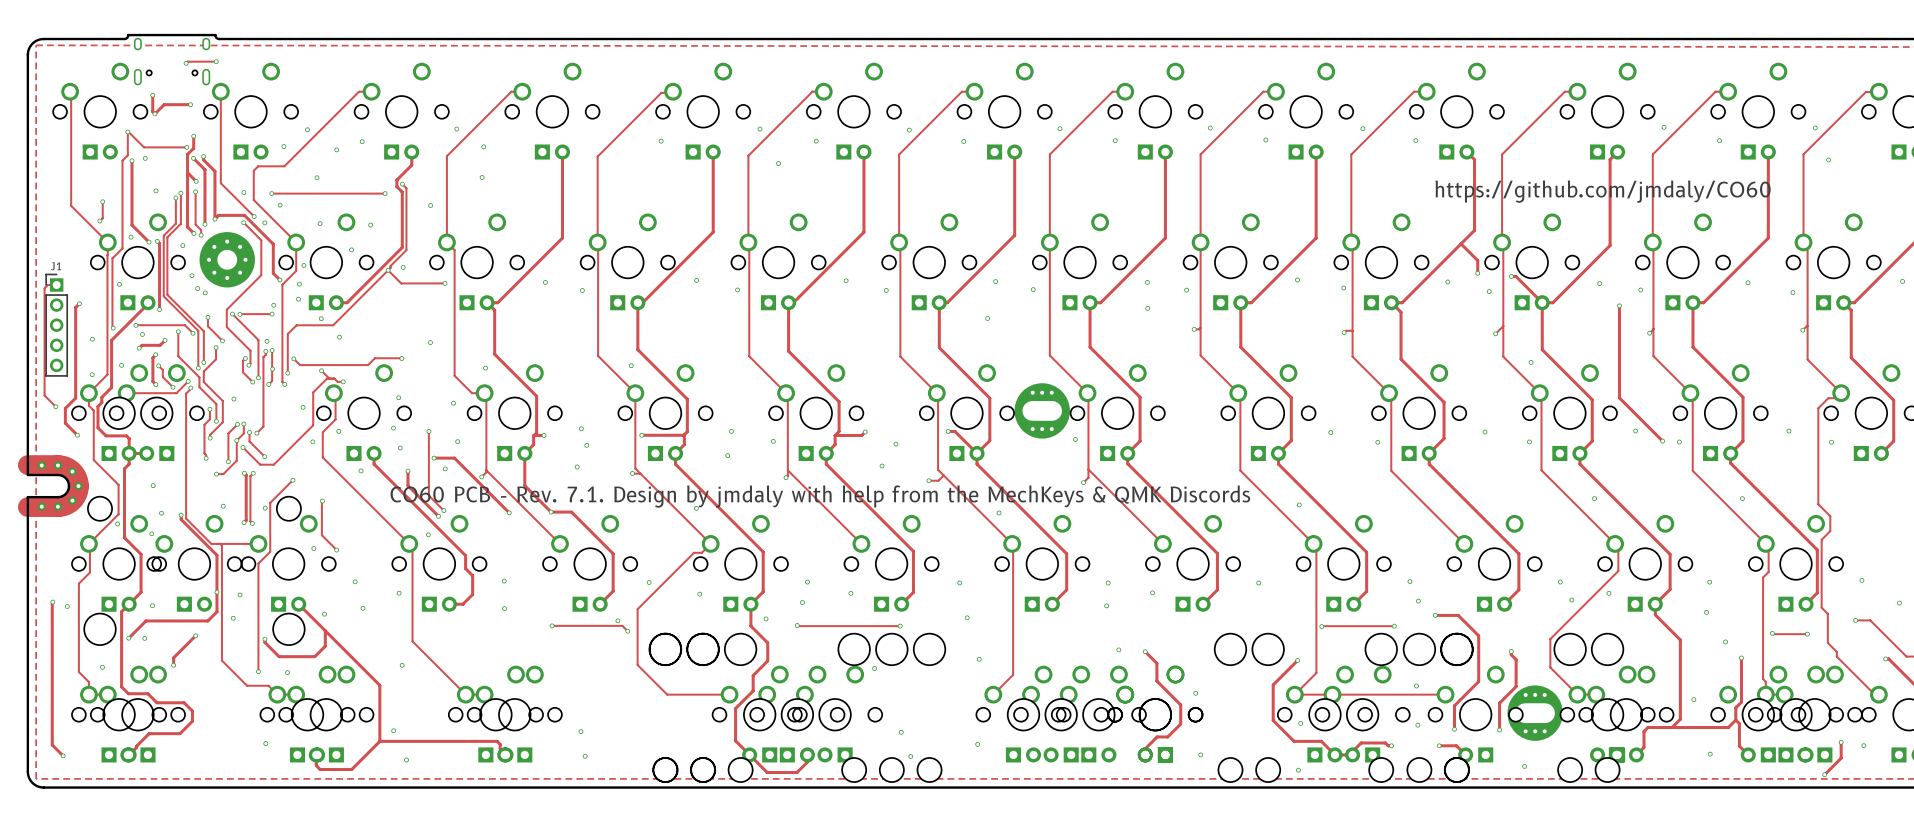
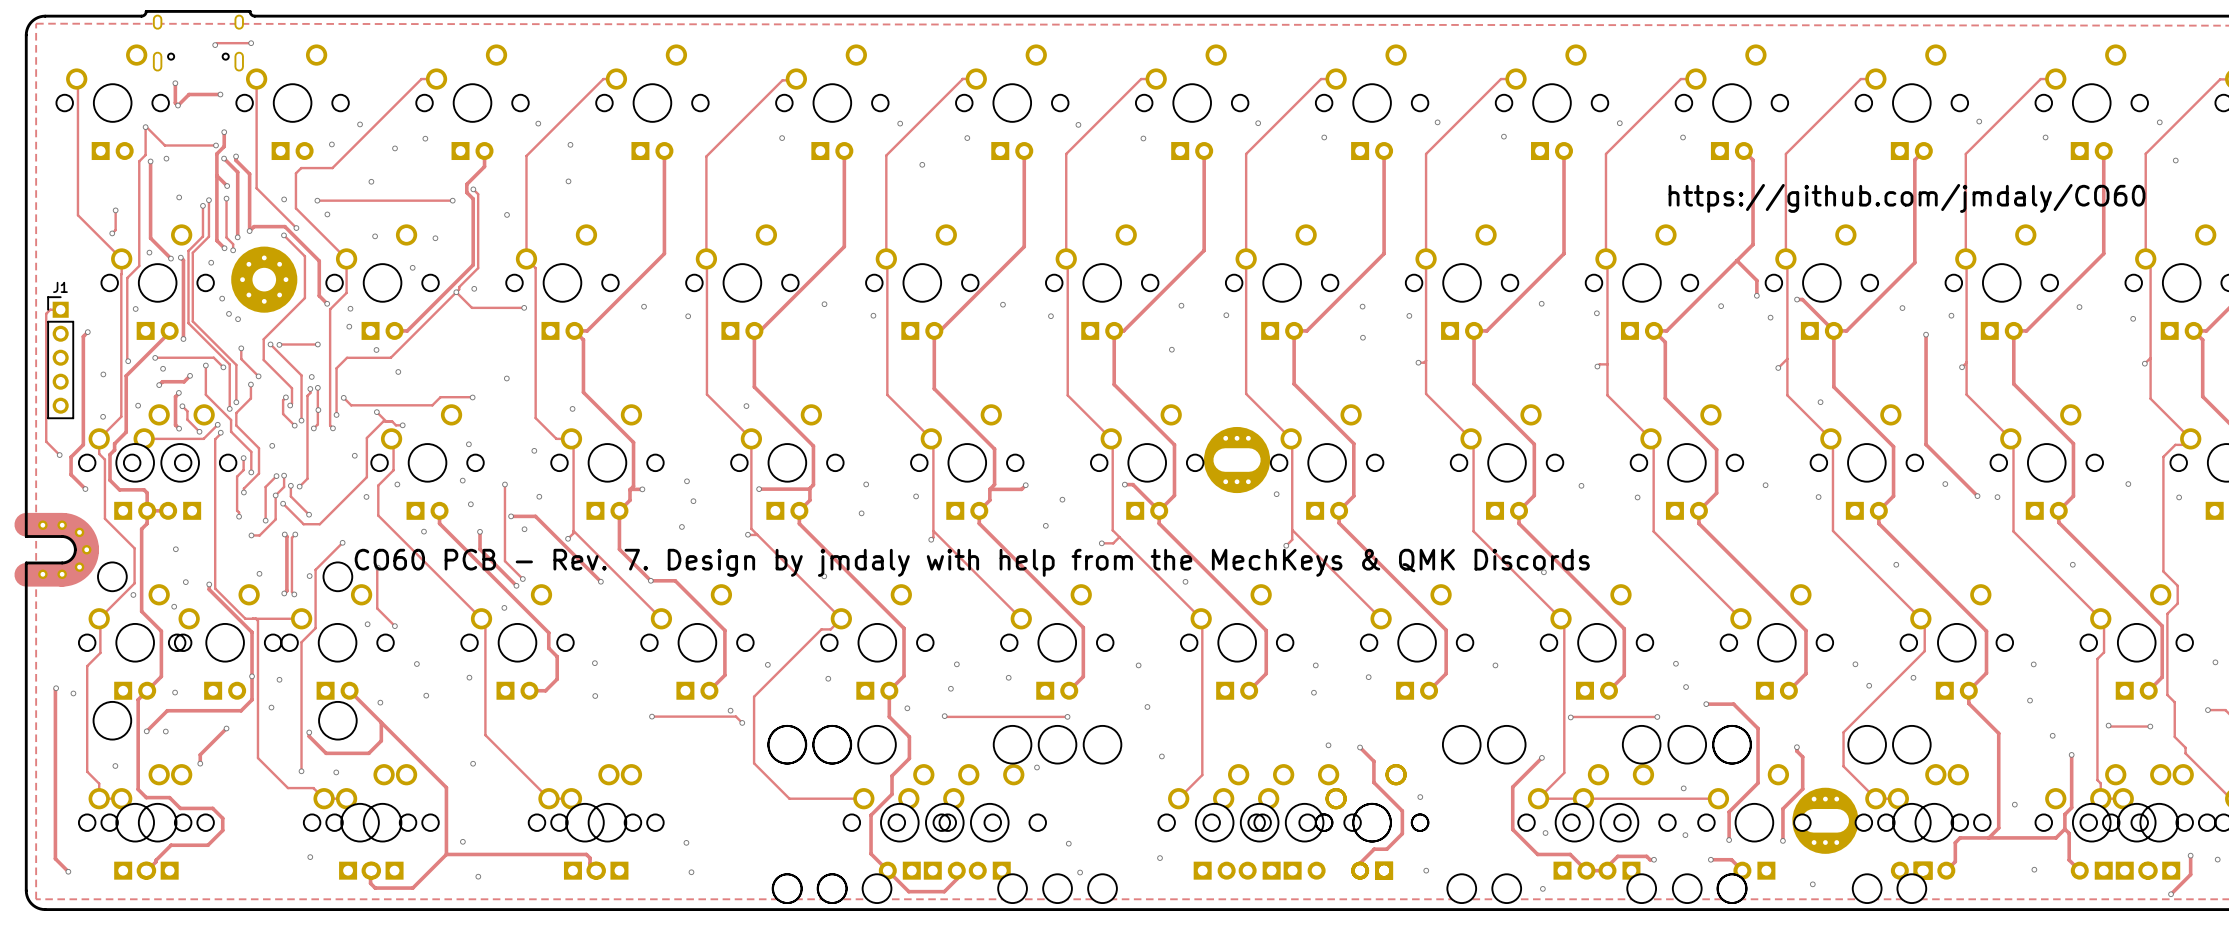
via: (264, 222) -> none
via: (303, 265) -> none
via: (273, 305) -> none
text: CO60 PCB - Rev. 7.1. Design by jmdaly with help from the MechKeys & QMK Discords (820, 496) -> CO60 PCB - Rev. 7. Design by jmdaly with help from the MechKeys & QMK Discords (972, 562)

